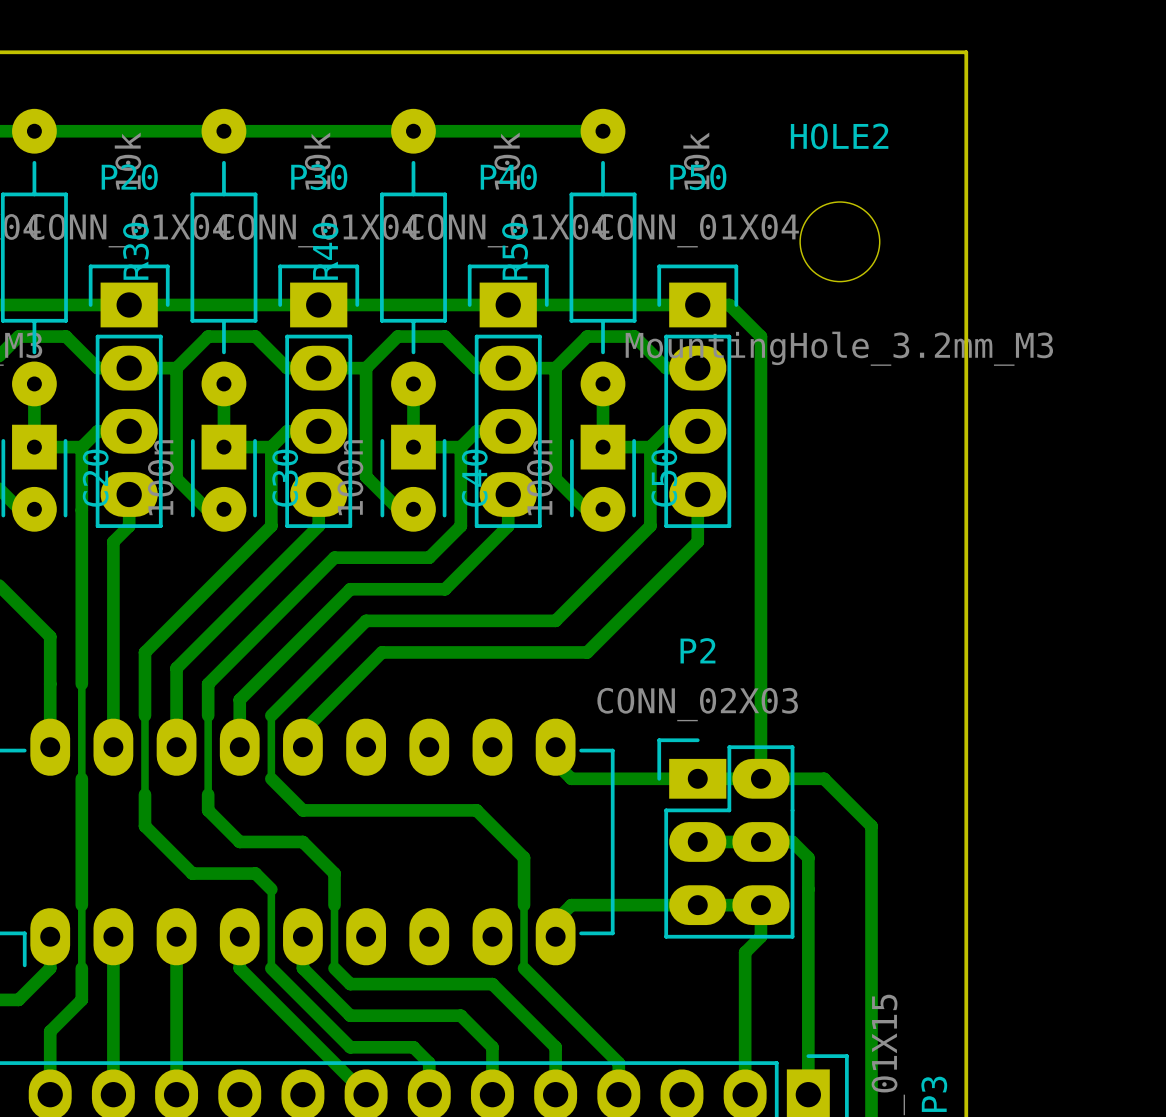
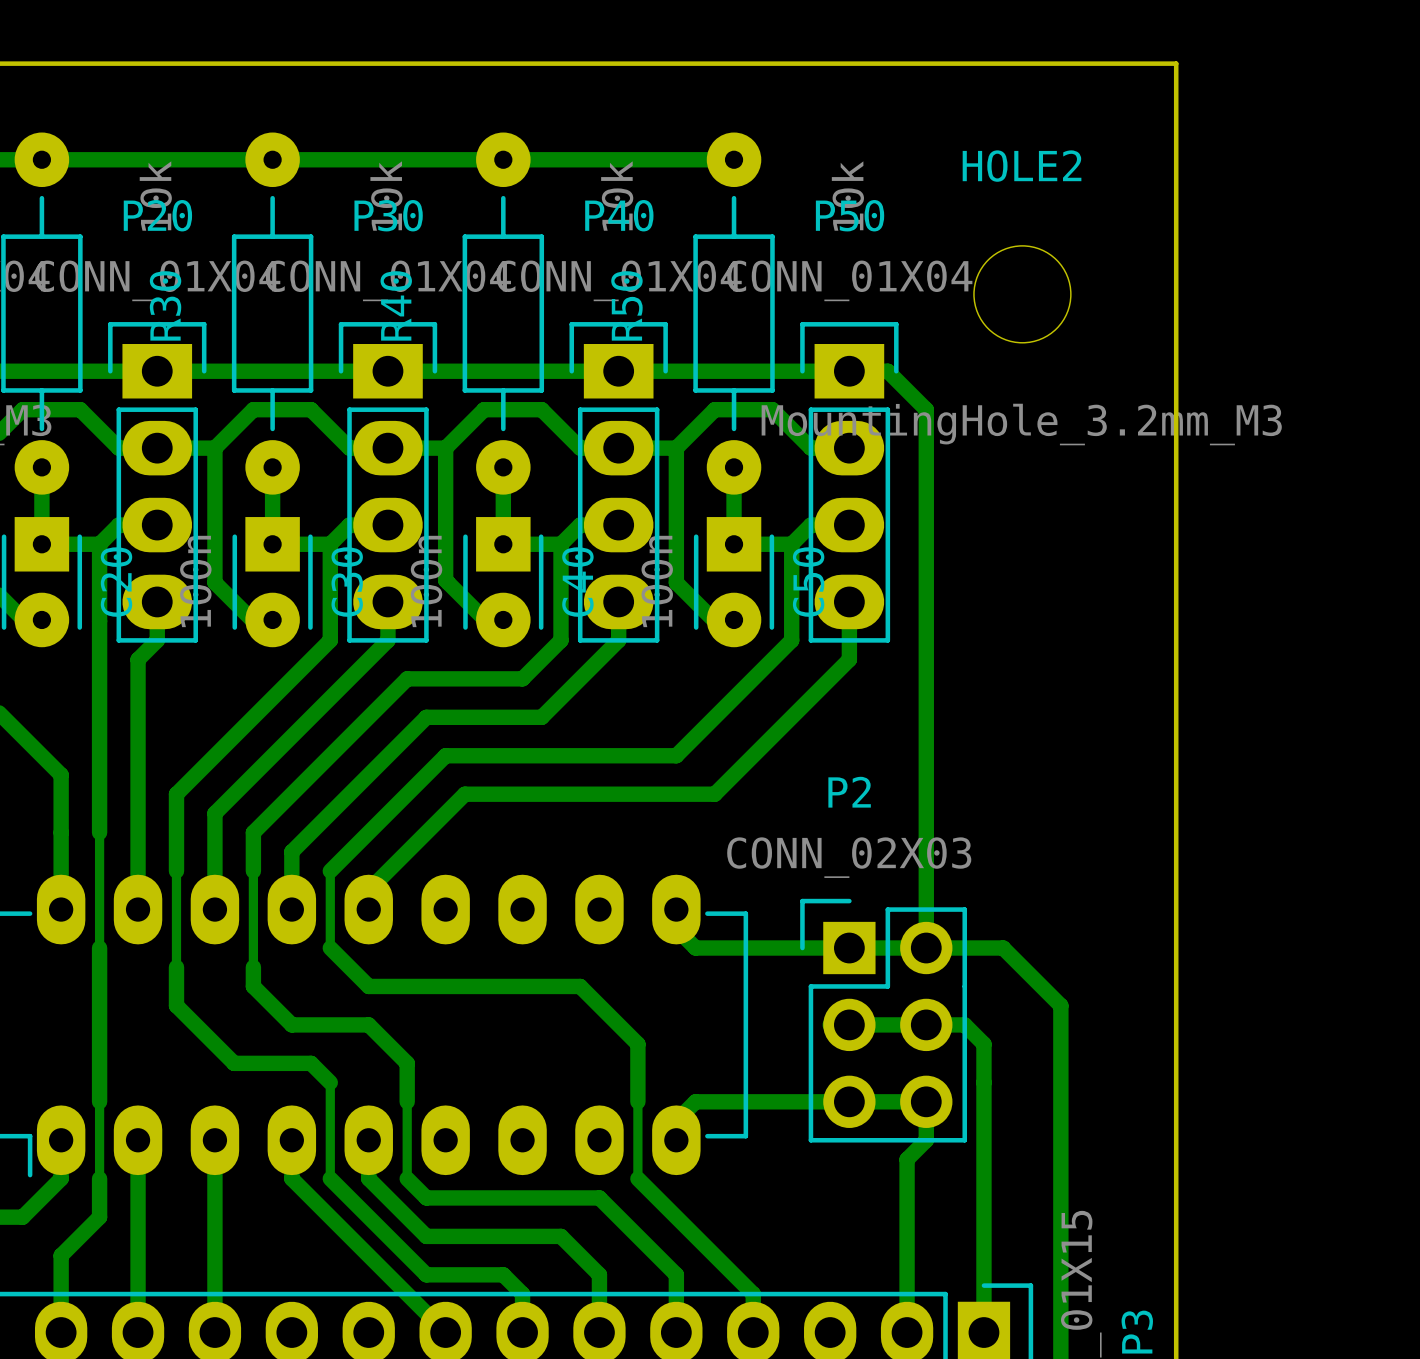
P2 footprint: [657, 738, 795, 939] -> [800, 898, 968, 1143]

